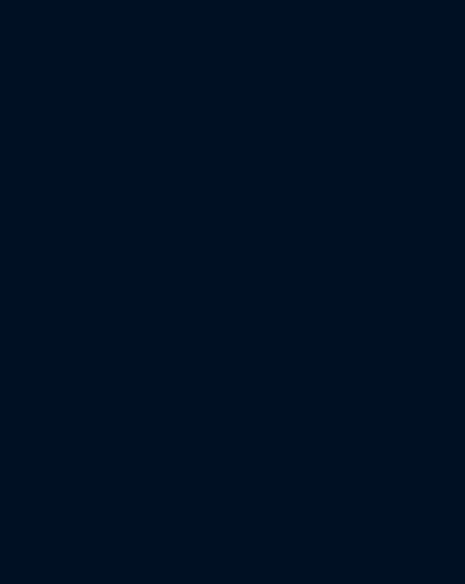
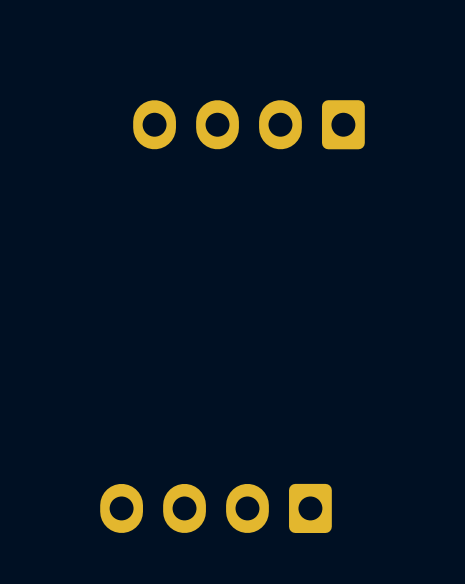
part: none -> (248, 124)
part: none -> (216, 508)

